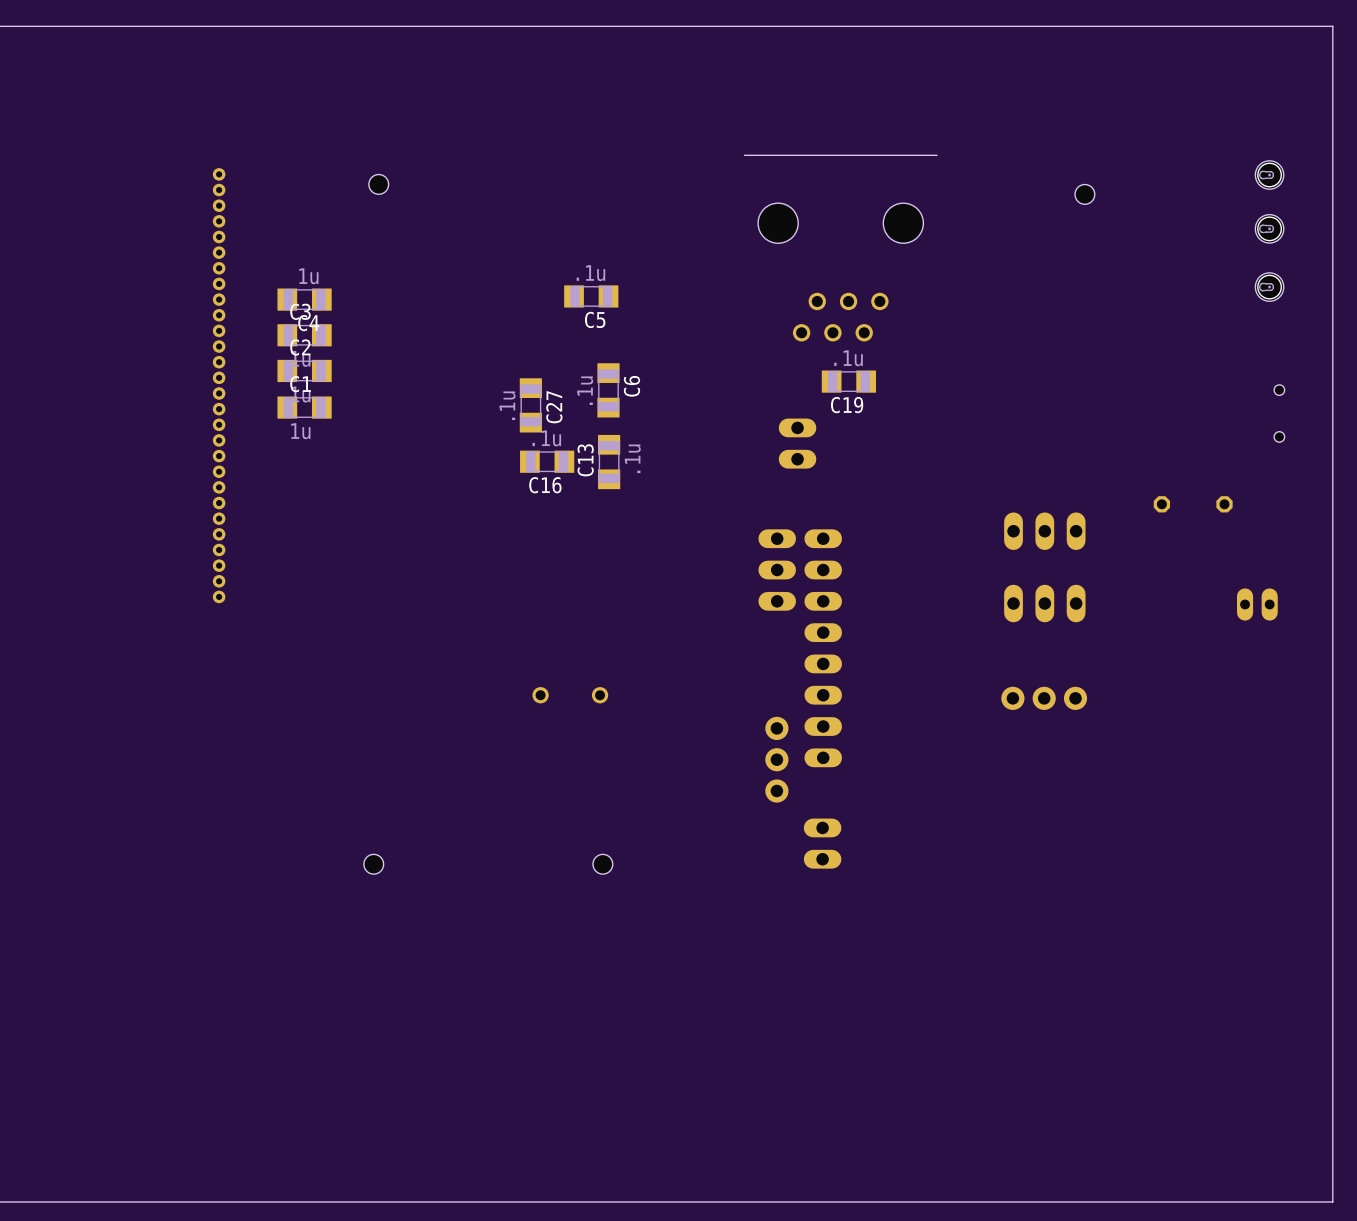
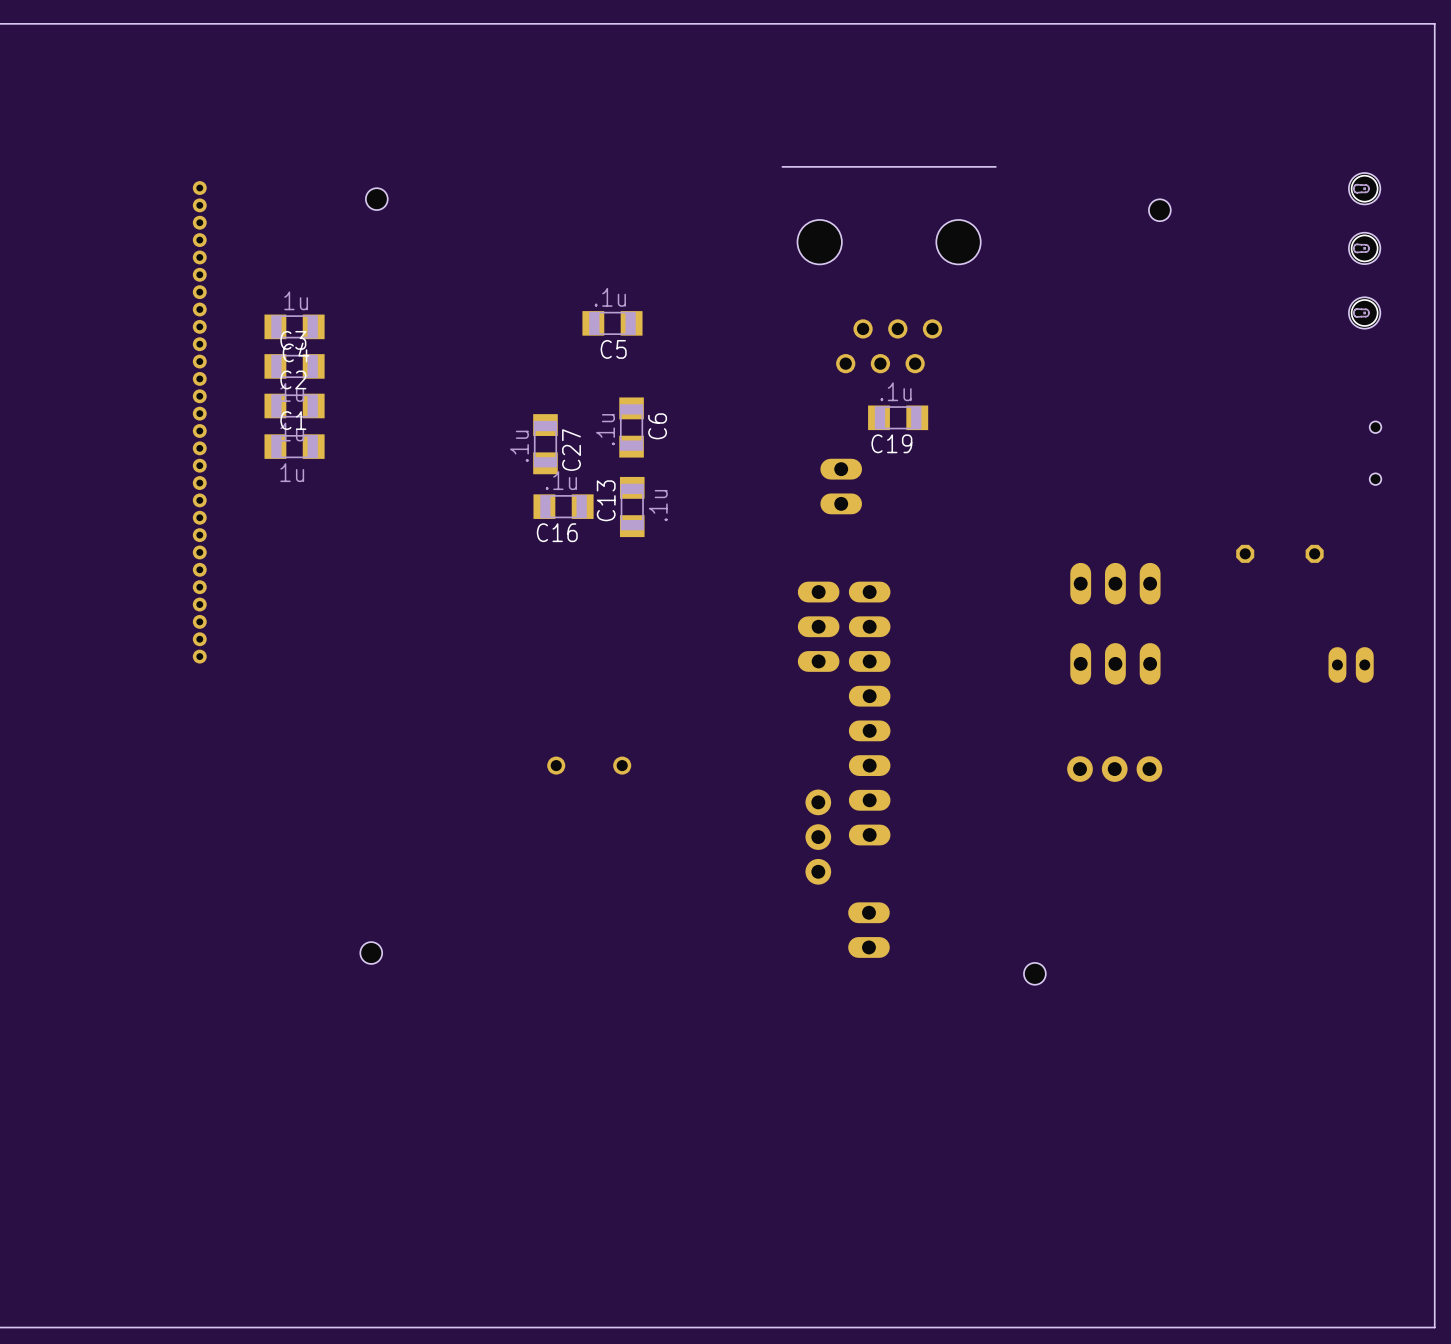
hole: (602, 864) -> none
hole: none -> (1034, 973)

